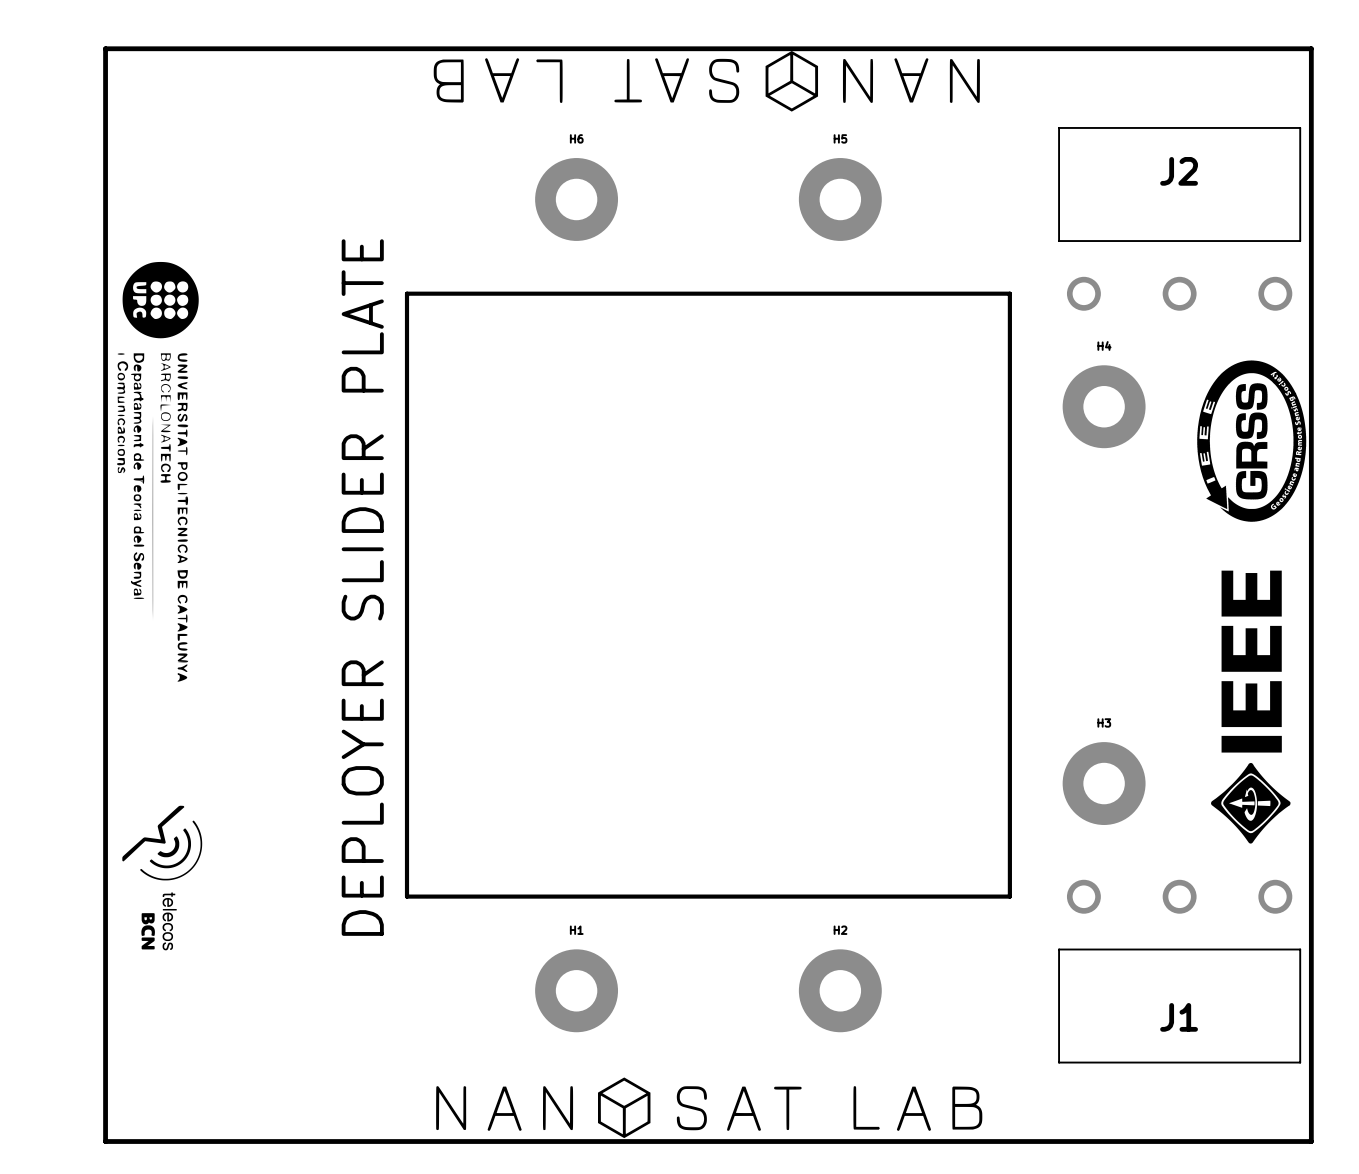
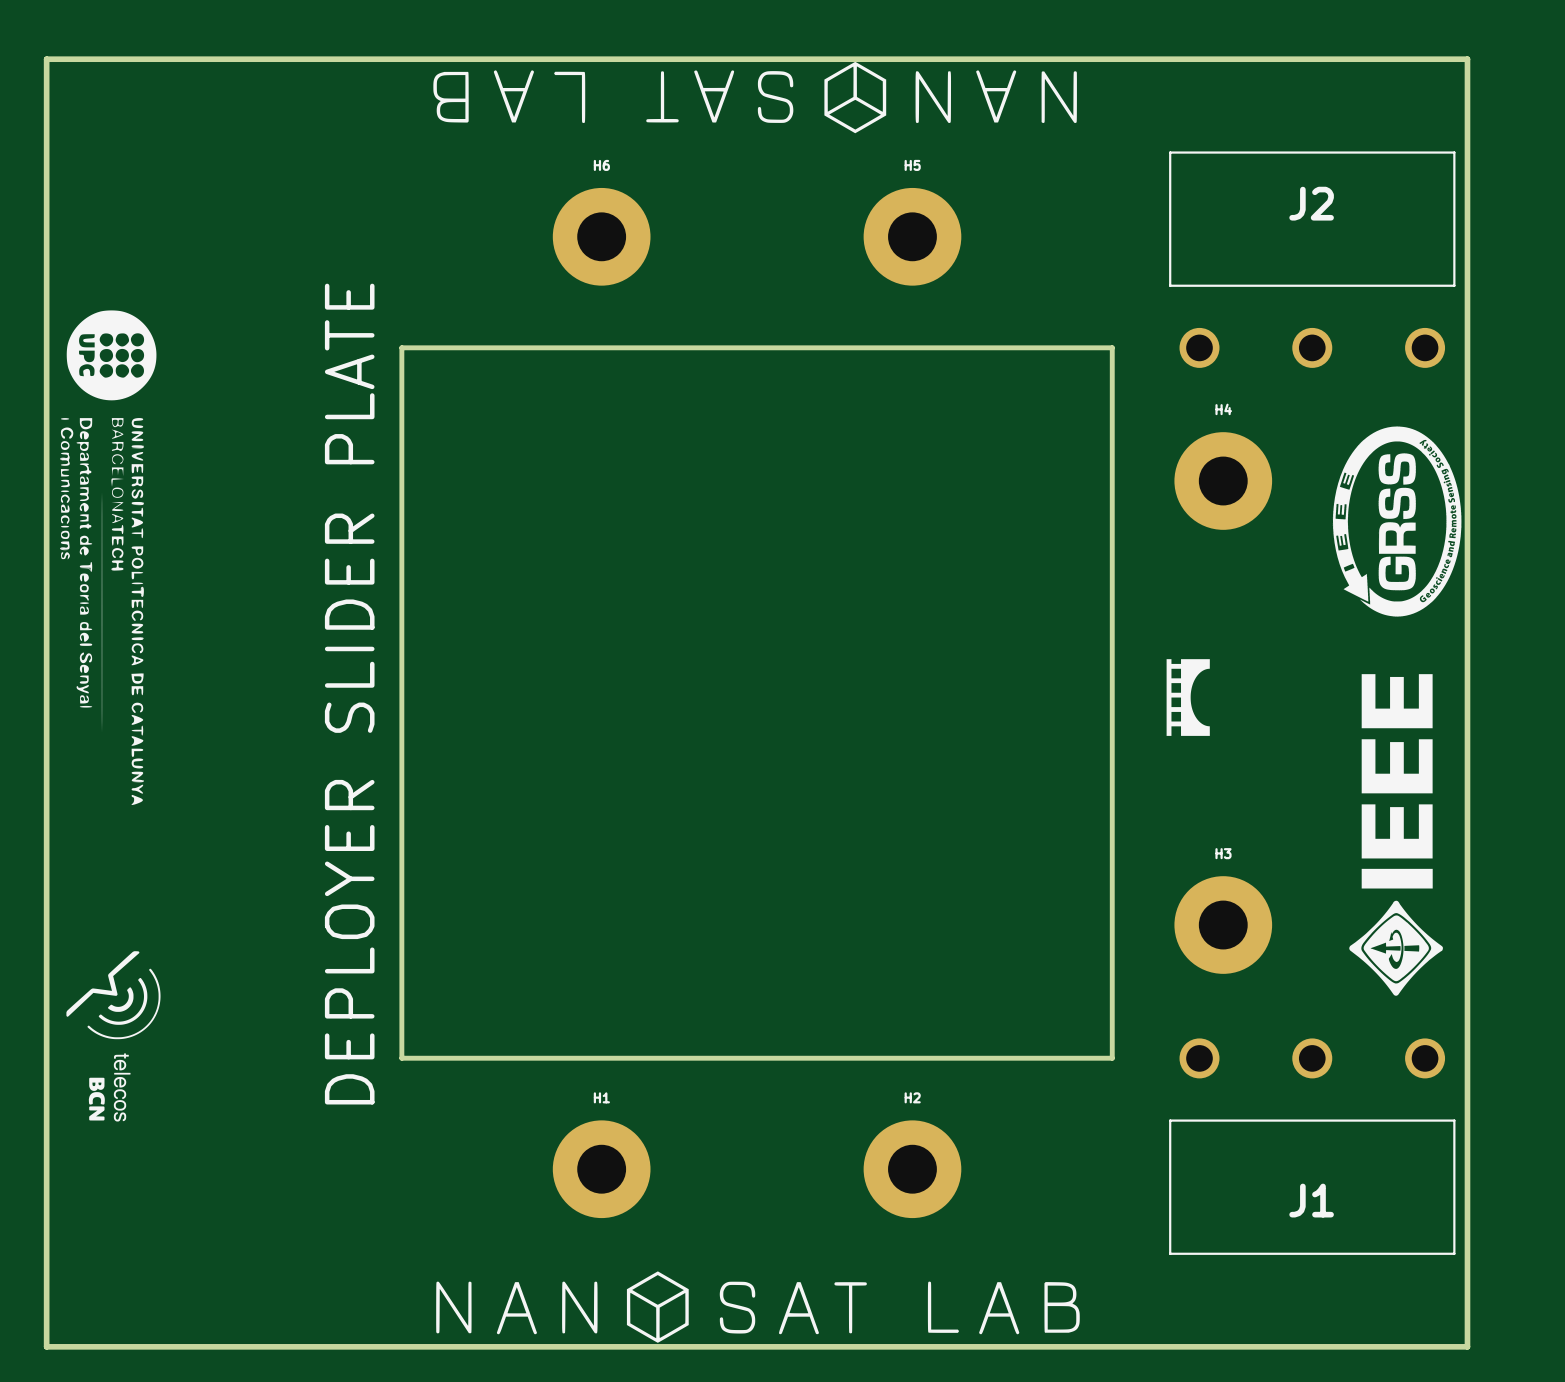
drawing: none -> [1166, 659, 1210, 736]

